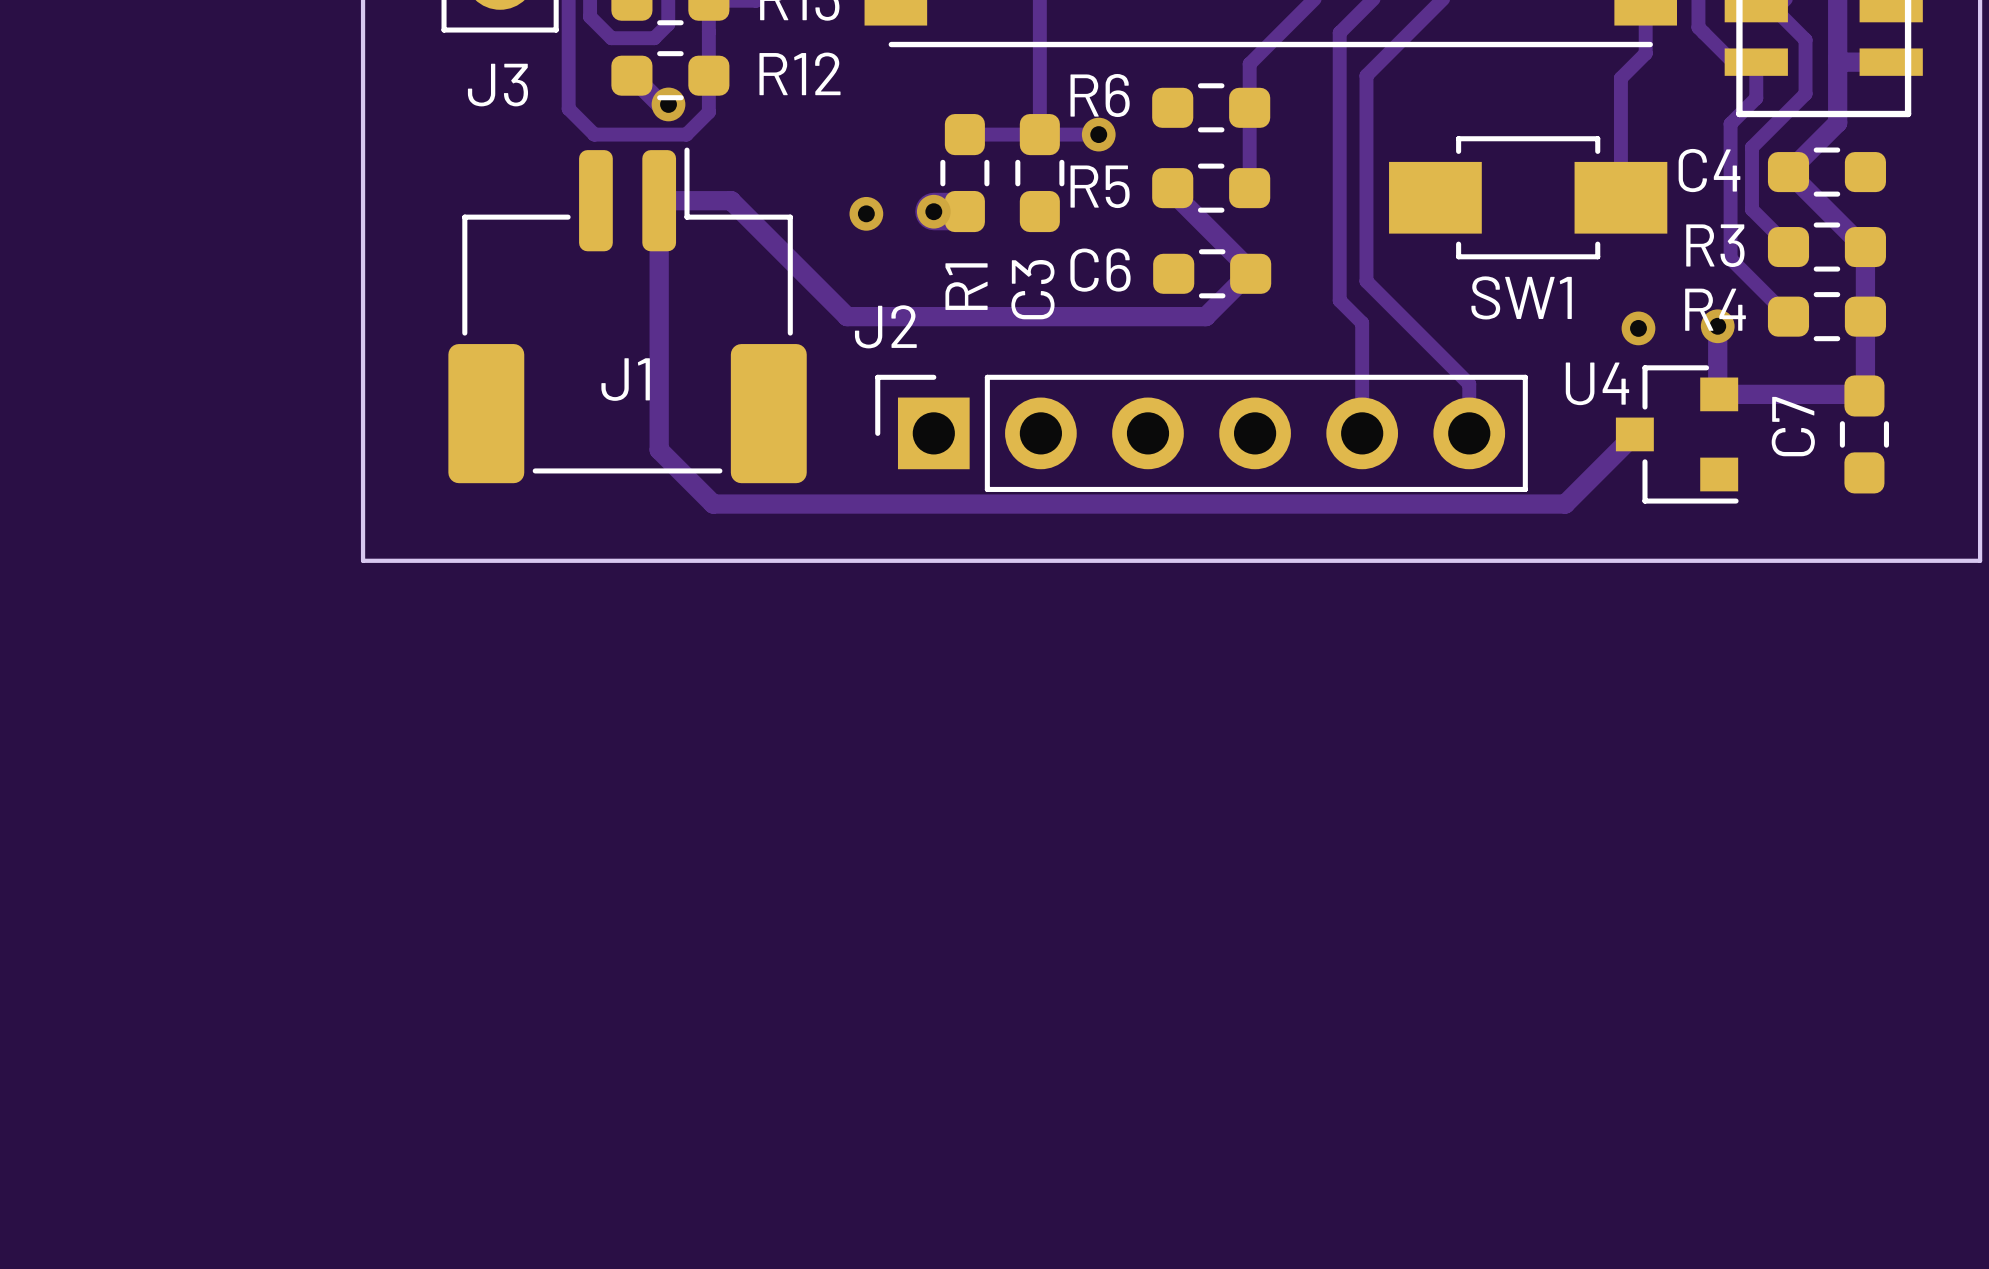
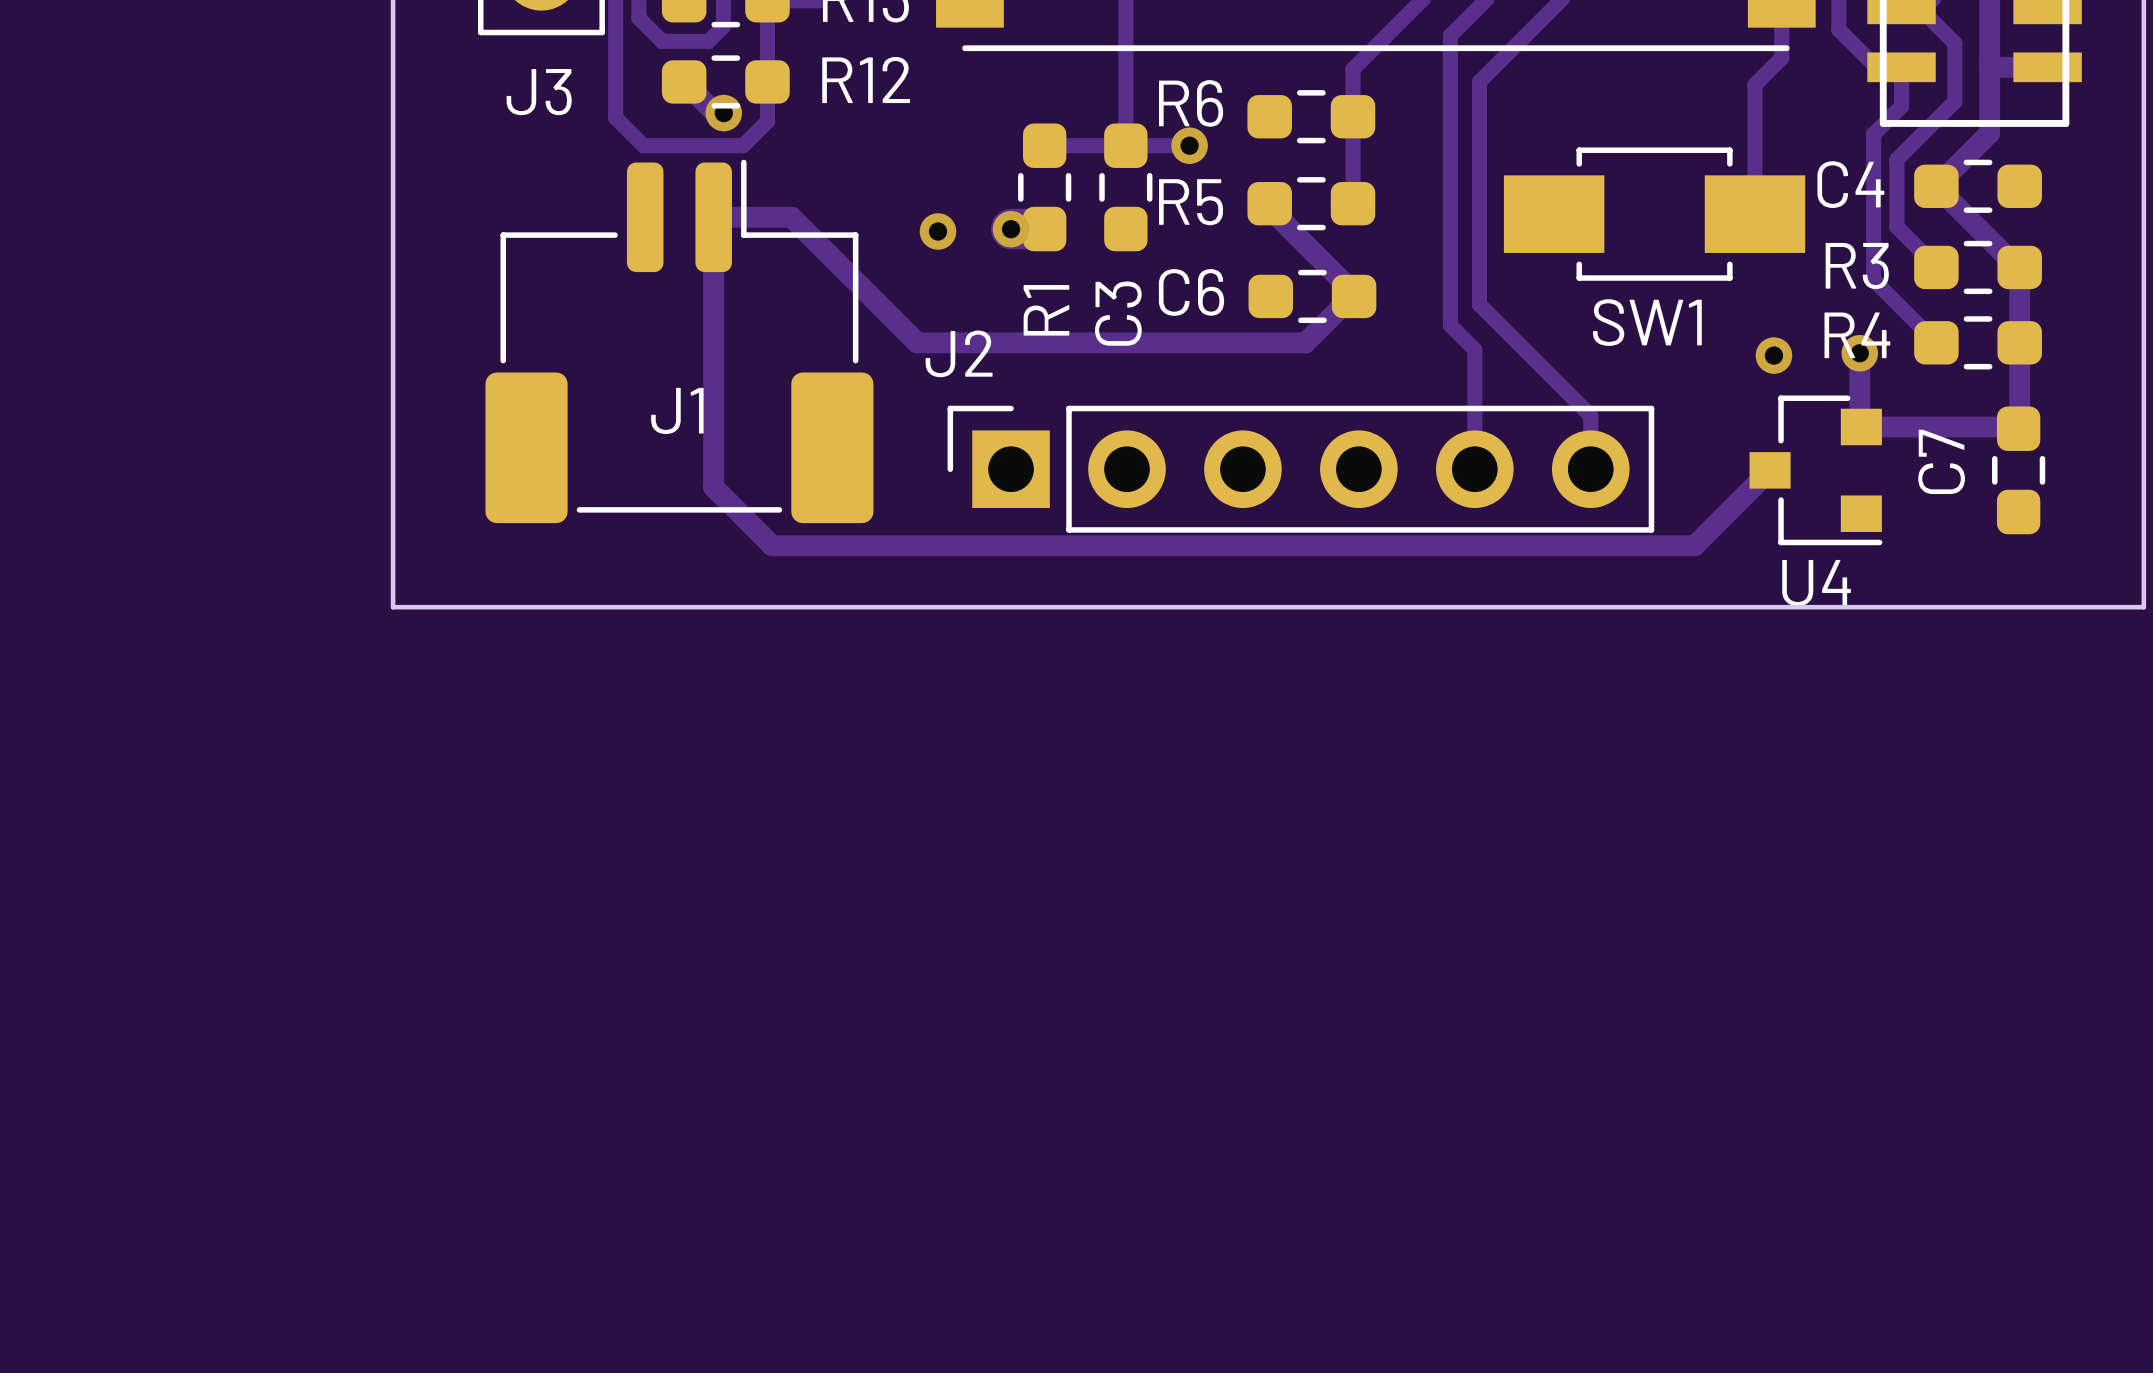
U4 name position: U4 (1597, 383) -> U4 (1816, 583)

